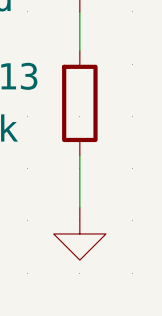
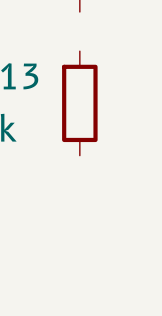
wire: (79, 11) (79, 51) -> none
wire: (79, 155) (79, 207) -> none
power symbol: (79, 233) -> none

